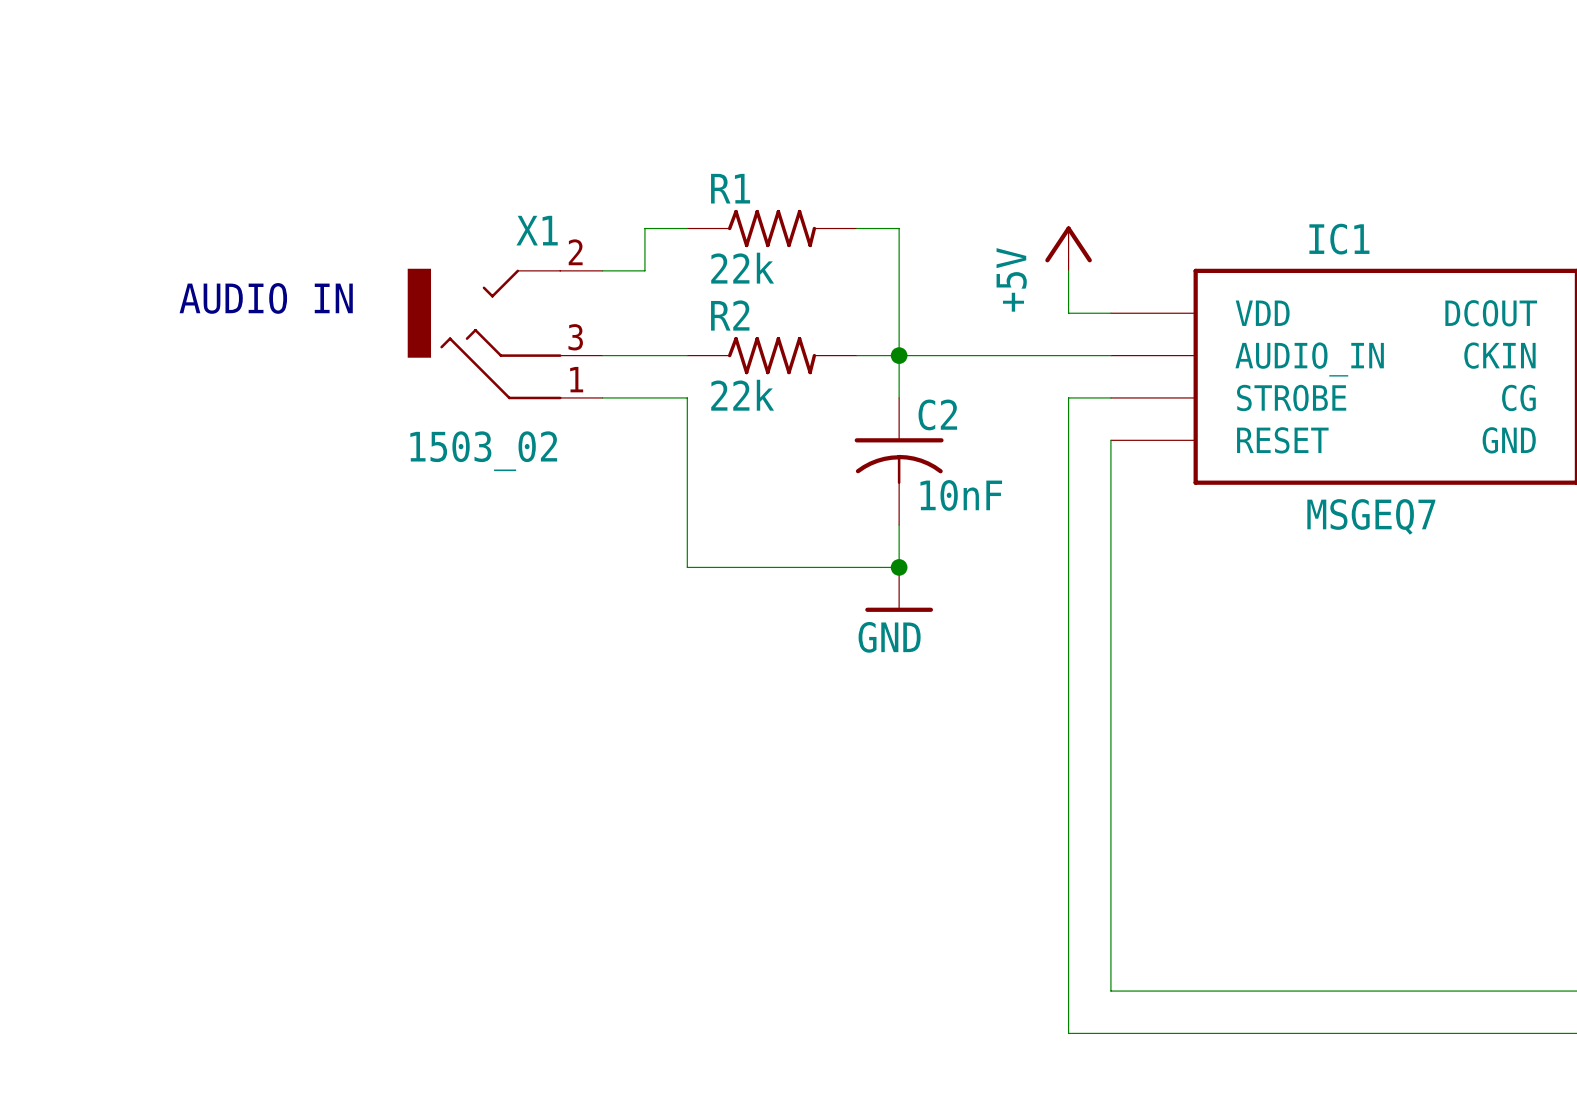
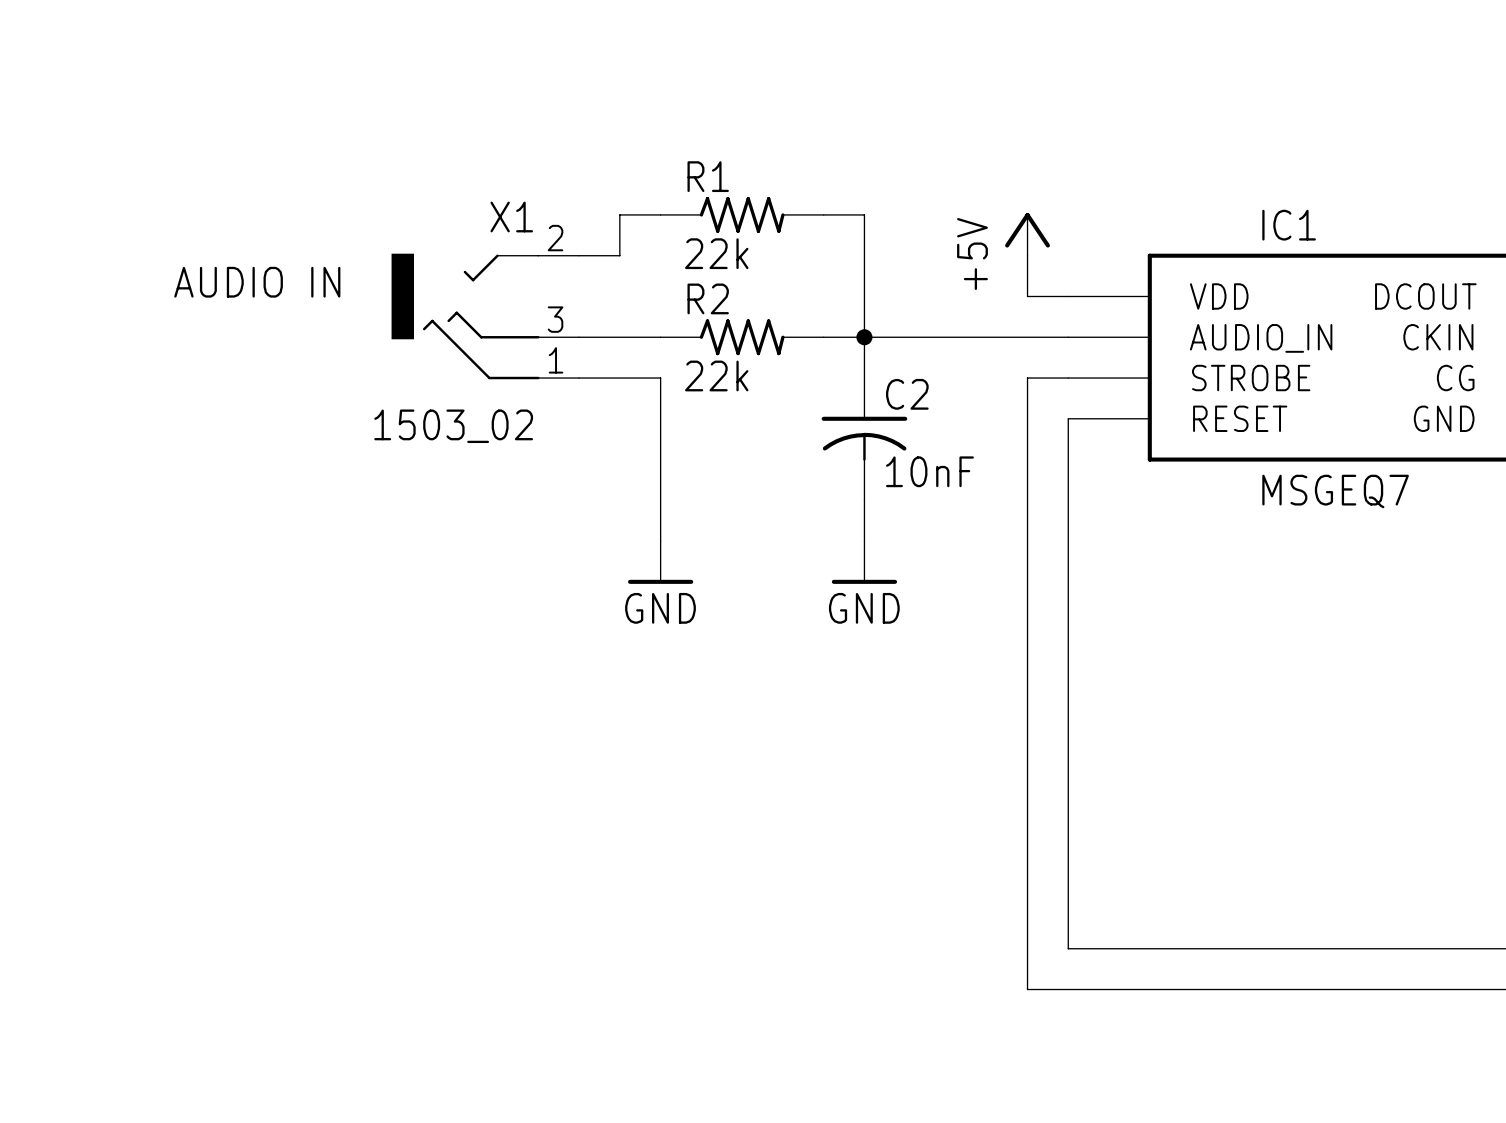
wire: (687, 567) (899, 567) -> none
junction: (899, 567) -> none
power symbol: none -> GND (660, 562)

